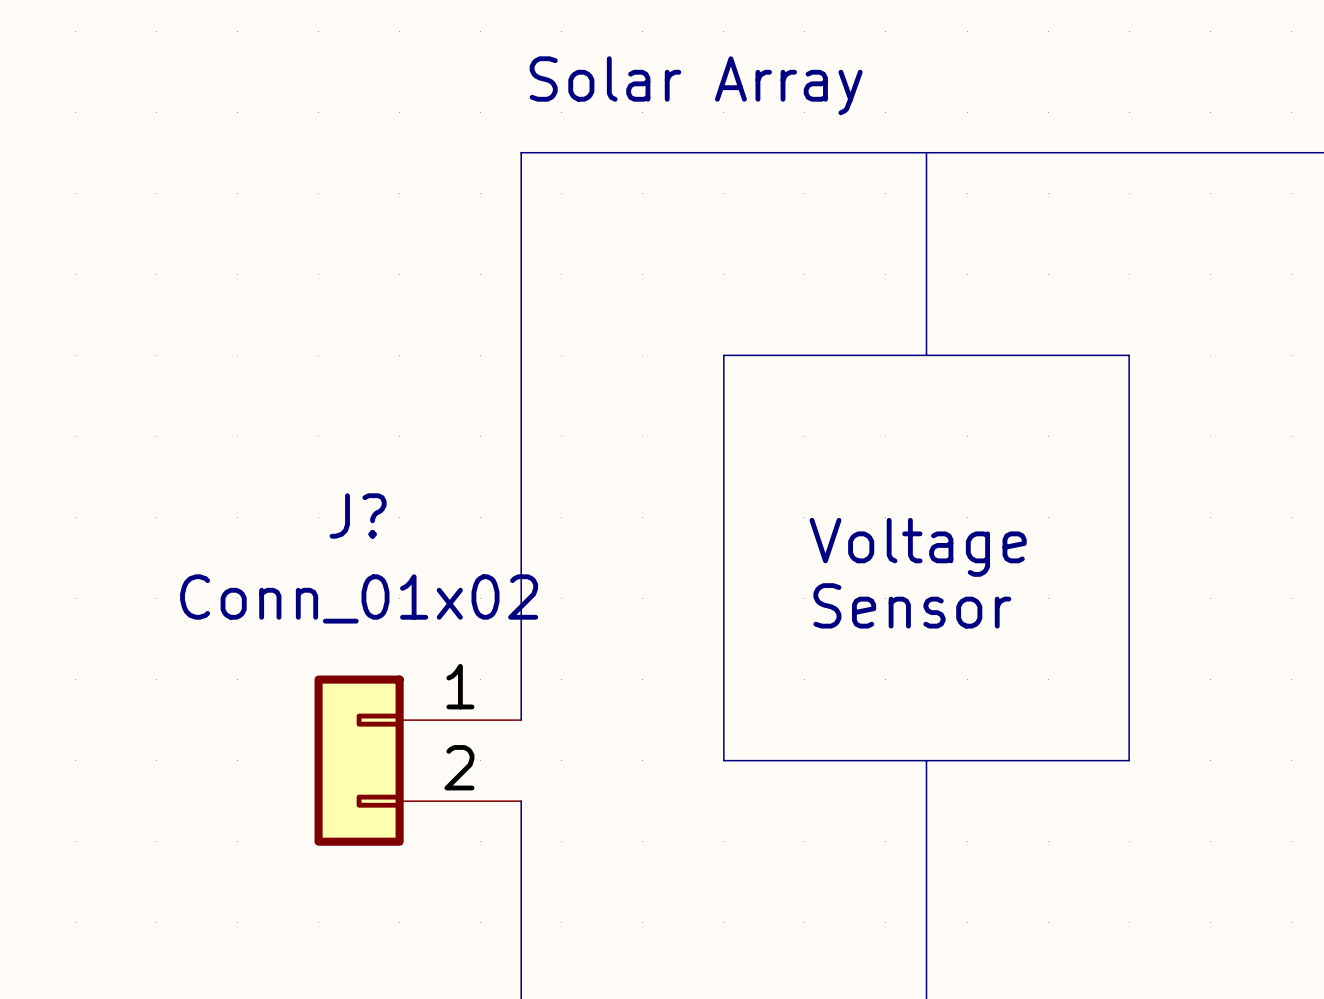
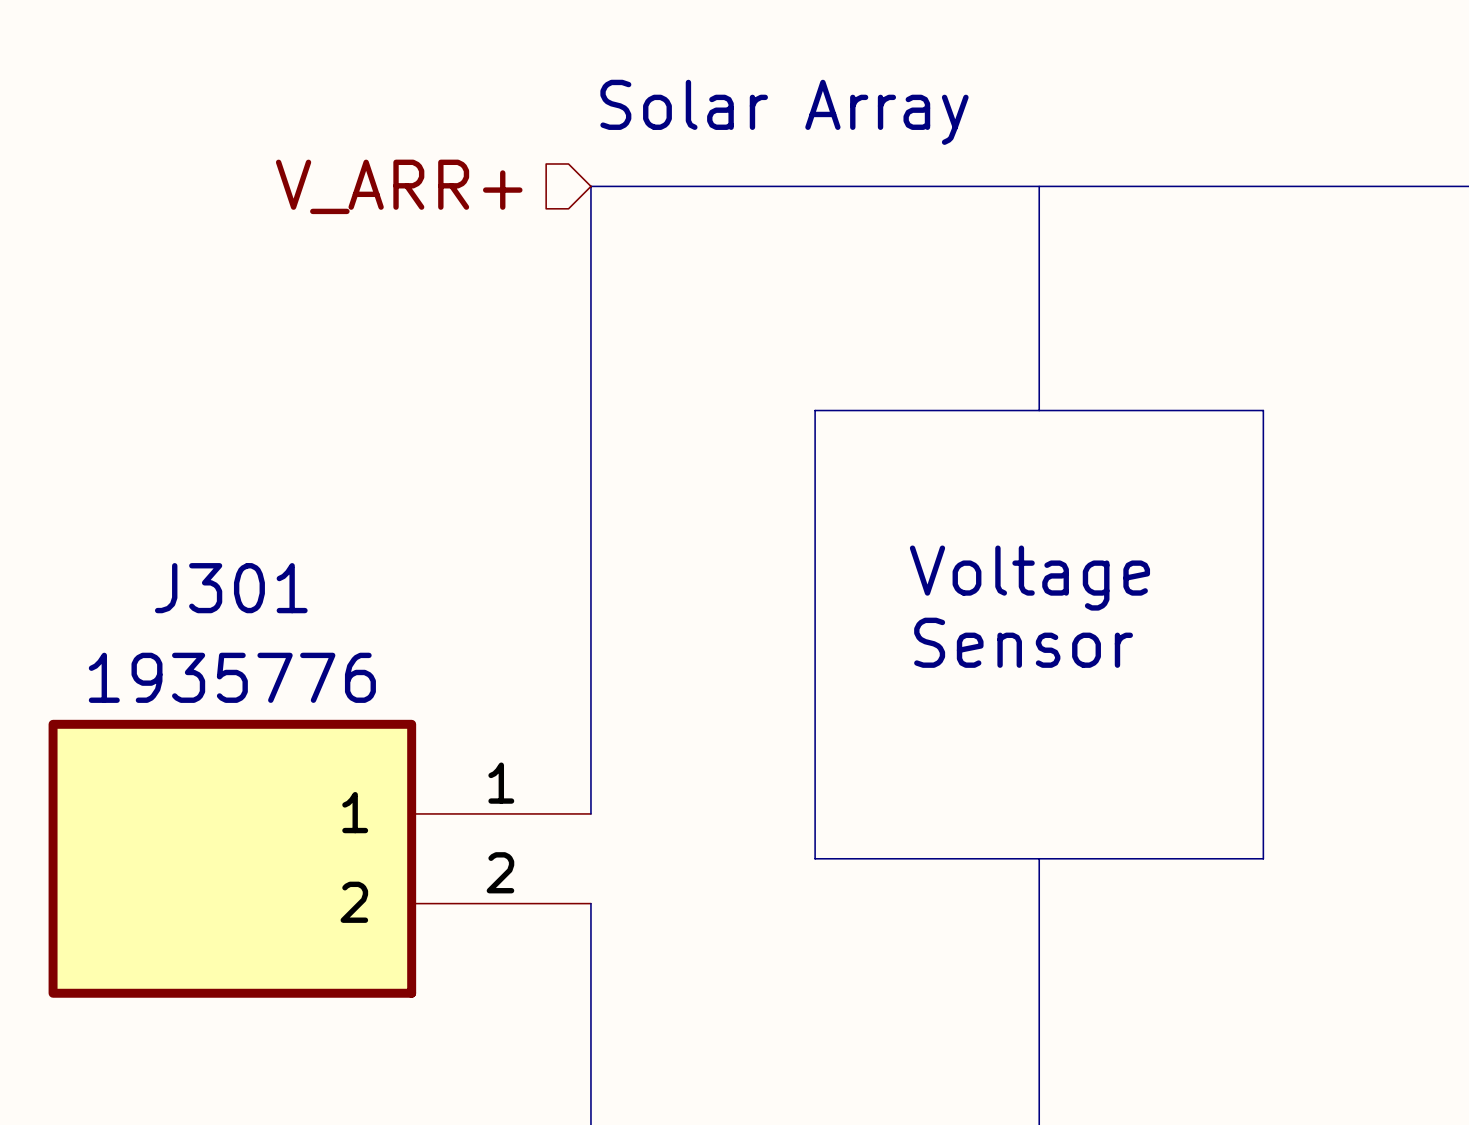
hierarchical label: none -> V_ARR+ (399, 186)
text position: Voltage (918, 547) -> Voltage (1029, 578)
text position: Sensor (912, 605) -> Sensor (1023, 642)
J301: none -> 1935776 (319, 858)
J?: Conn_01x02 (417, 760) -> none

